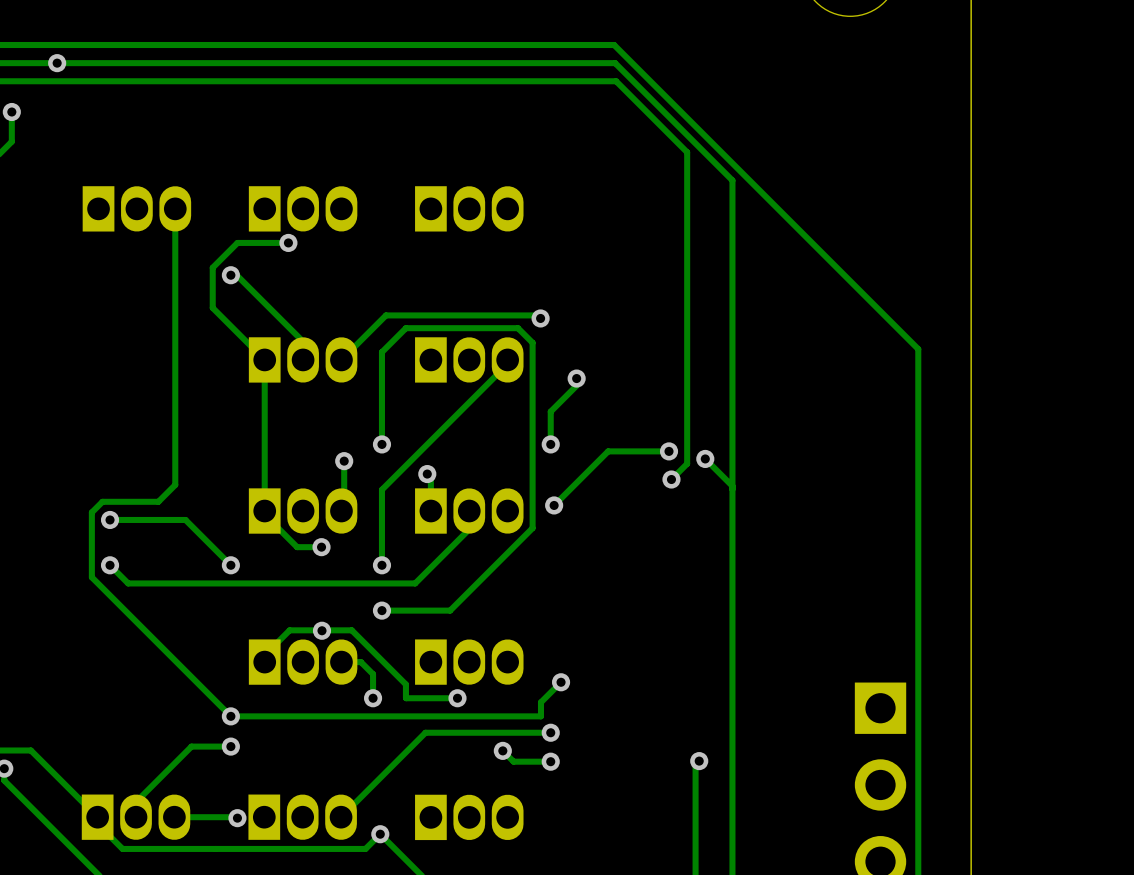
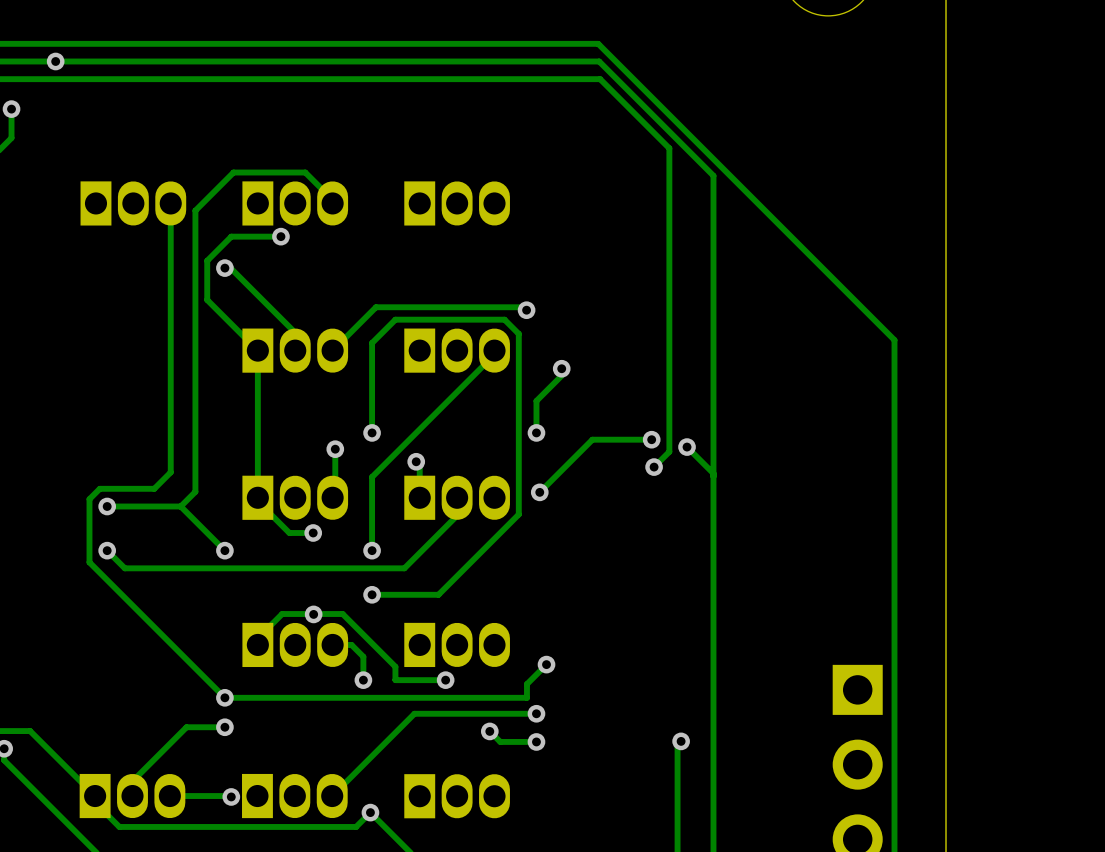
track: none -> (332, 203) (332, 199) (305, 172) (233, 172) (195, 210) (195, 491) (180, 506)

